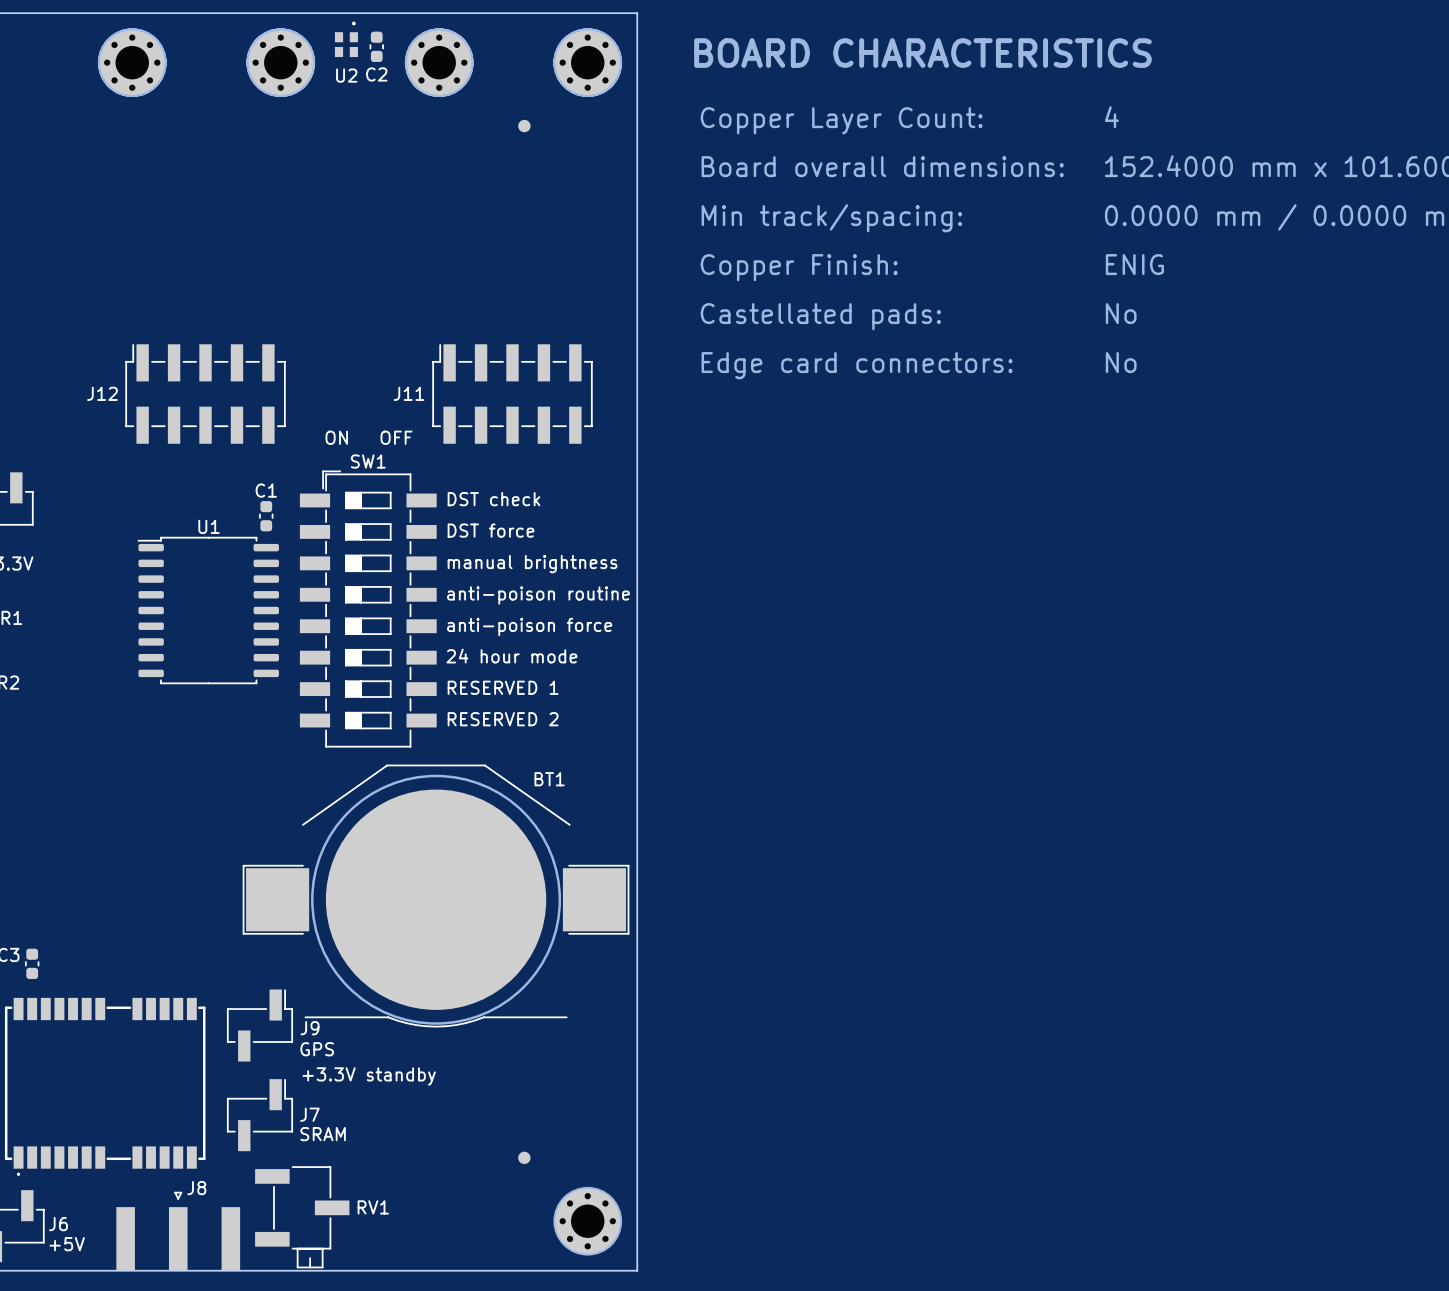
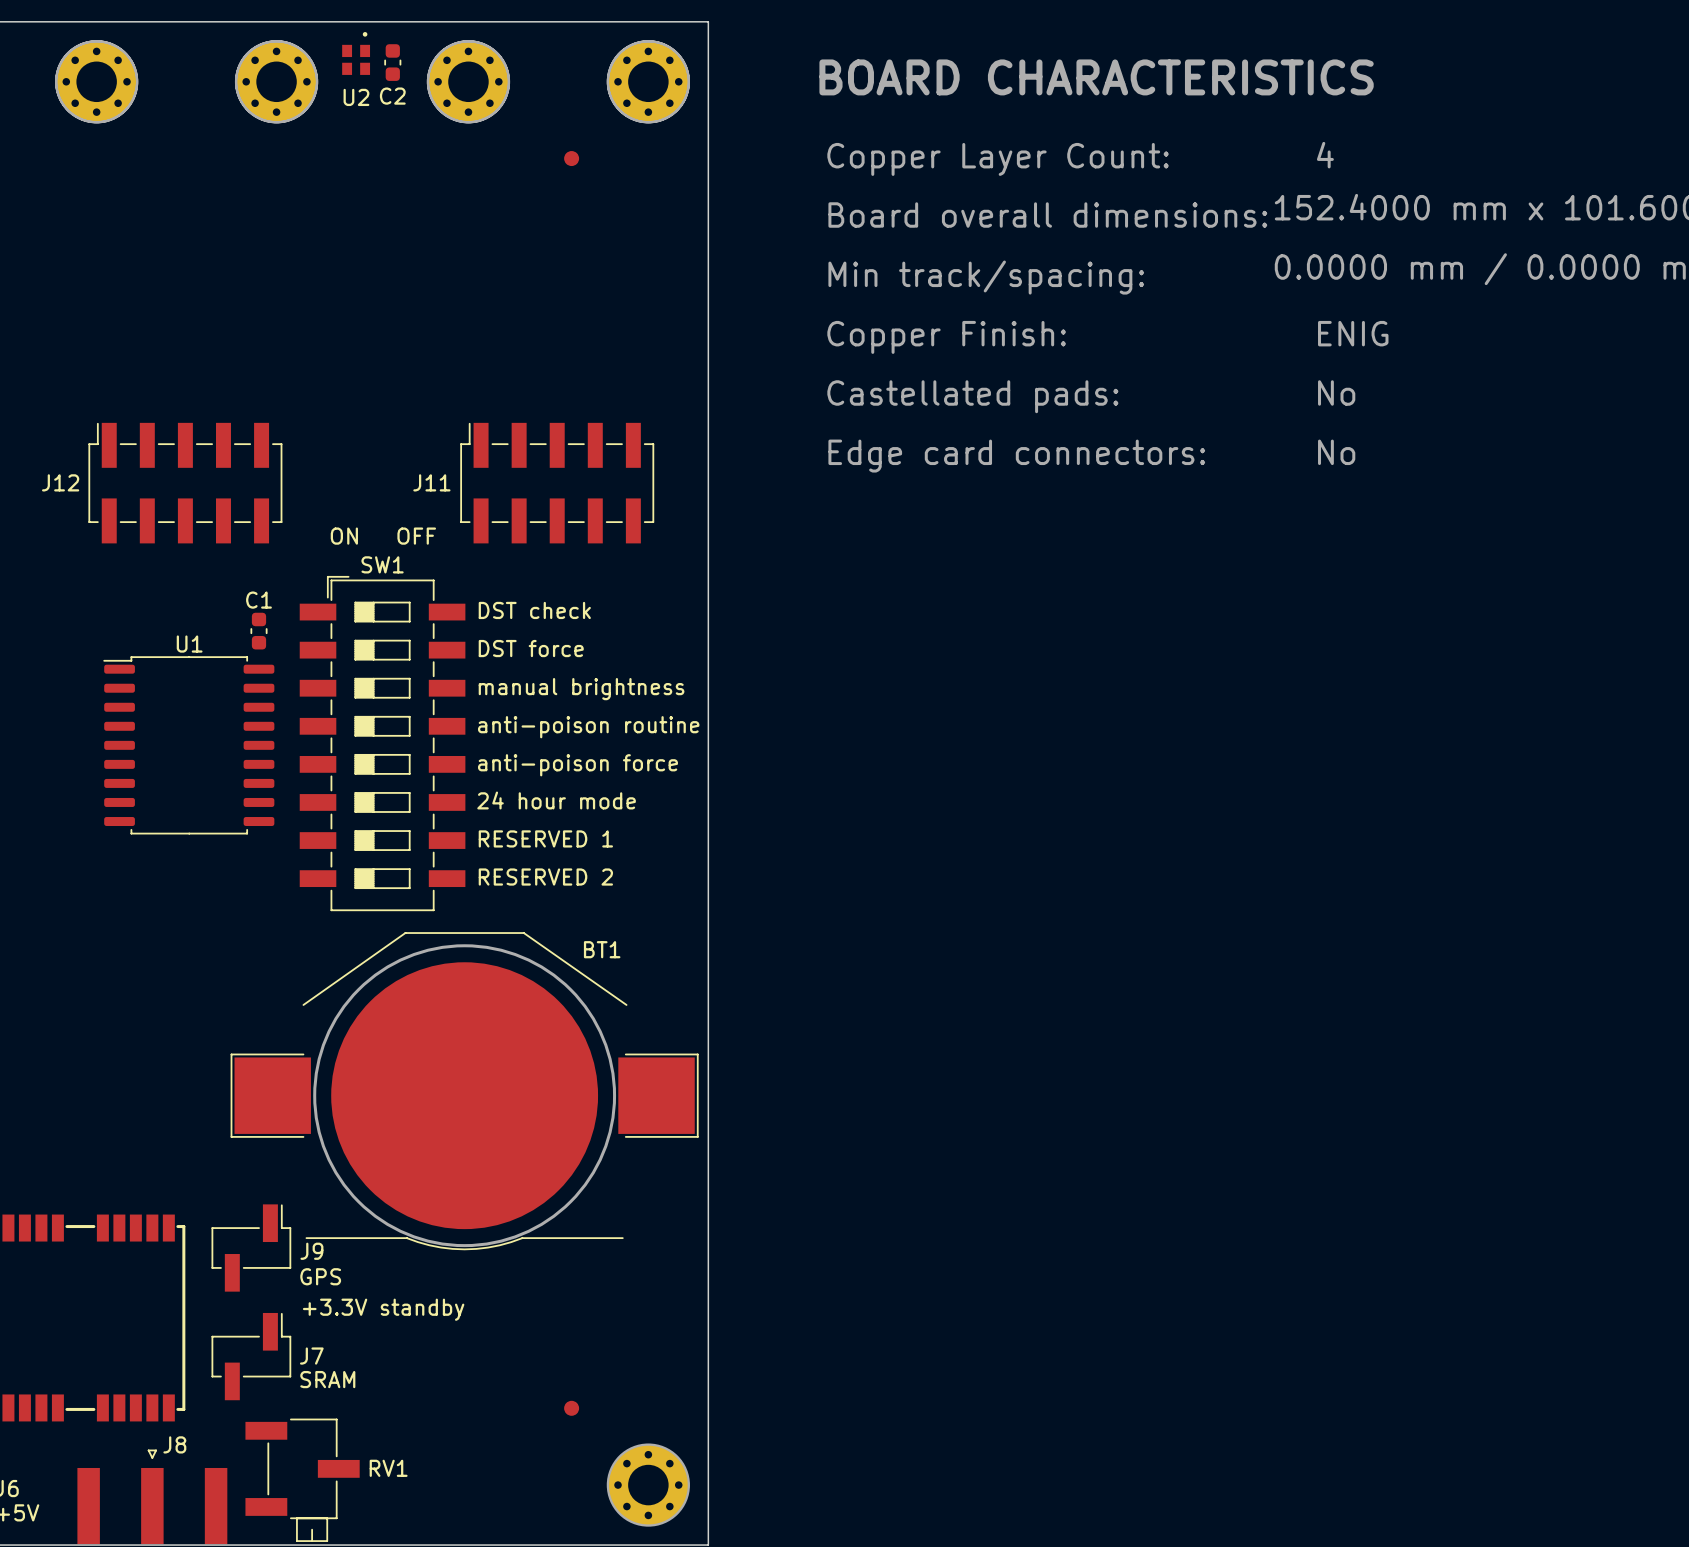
text position: BOARD CHARACTERISTICS (922, 53) -> BOARD CHARACTERISTICS (1096, 77)
text position: 4 (1111, 117) -> 4 (1325, 155)
text position: Copper Layer Count: (841, 120) -> Copper Layer Count: (998, 159)
text position: Board overall dimensions: (882, 166) -> Board overall dimensions: (1047, 215)
text position: Min track/spacing: (831, 218) -> Min track/spacing: (986, 277)
text position: ENIG (1134, 264) -> ENIG (1353, 333)
text position: Copper Finish: (799, 267) -> Copper Finish: (946, 337)
text position: No (1121, 313) -> No (1336, 392)
text position: Castellated pads: (820, 316) -> Castellated pads: (972, 396)
text position: No (1121, 362) -> No (1336, 452)
text position: Edge card connectors: (857, 365) -> Edge card connectors: (1016, 456)

